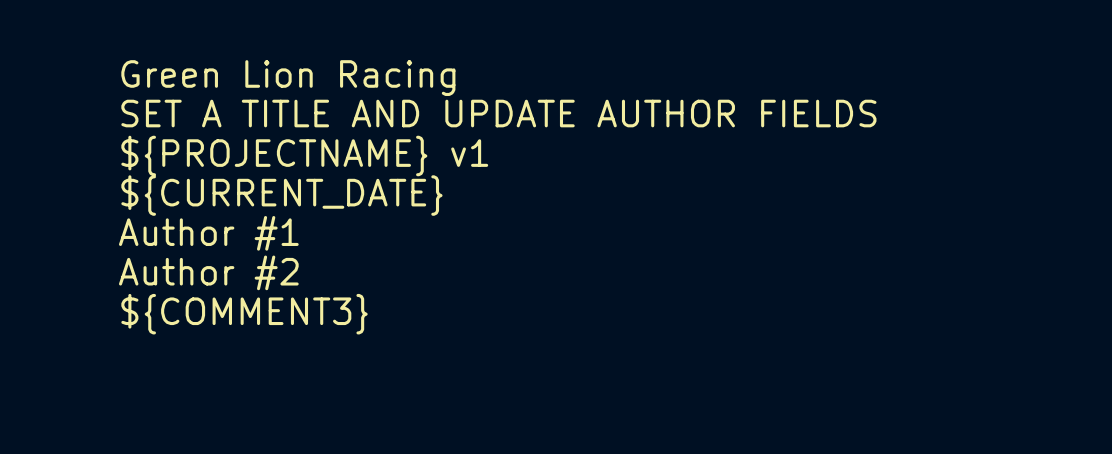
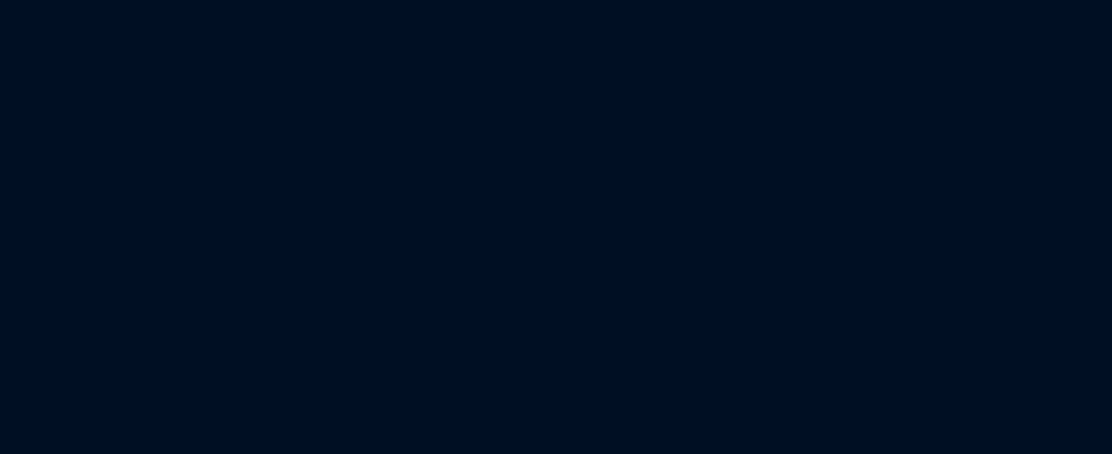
text: Green Lion Racing (288, 78) -> none
text: SET A TITLE AND UPDATE AUTHOR FIELDS (498, 113) -> none
text: ${PROJECTNAME} v1 (304, 155) -> none
text: ${CURRENT_DATE} (281, 195) -> none
text: Author #1 (208, 233) -> none
text: Author #2 (208, 272) -> none
text: ${COMMENT3} (244, 314) -> none

